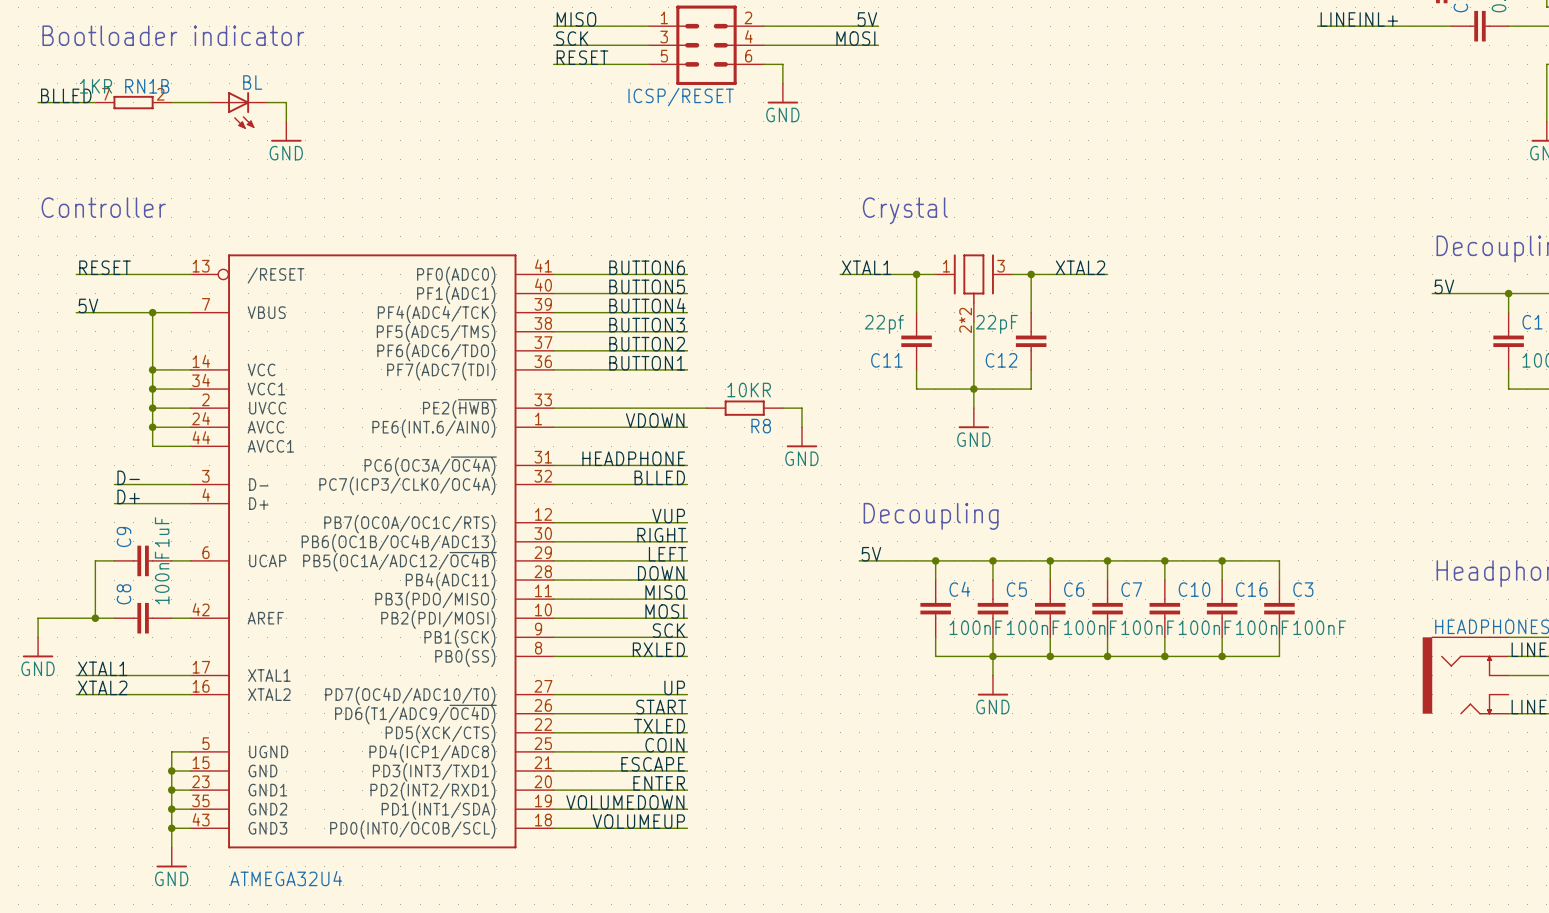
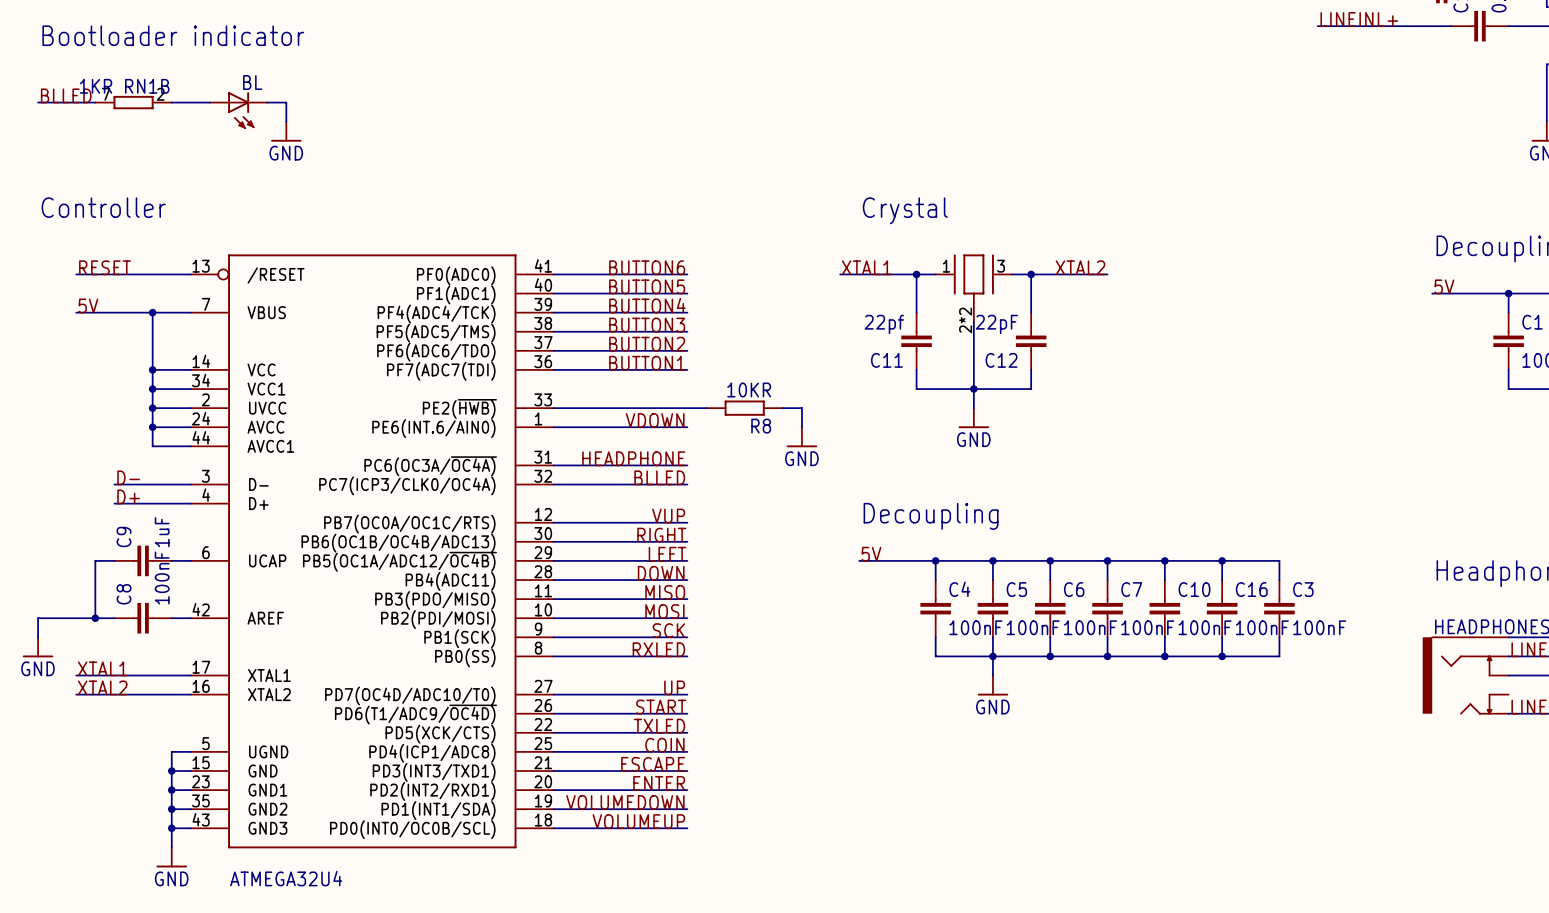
label: MISO (576, 19) -> none
label: 5V (867, 19) -> none
wire: (553, 26) (649, 26) -> none
wire: (763, 26) (878, 26) -> none
label: SCK (572, 38) -> none
label: MOSI (855, 38) -> none
wire: (553, 45) (649, 45) -> none
ICSP/RESET: (706, 45) -> none
wire: (763, 45) (878, 45) -> none
label: RESET (582, 57) -> none
wire: (553, 64) (649, 64) -> none
wire: (763, 64) (782, 64) (782, 83) -> none
power symbol: GND (782, 93) -> none

